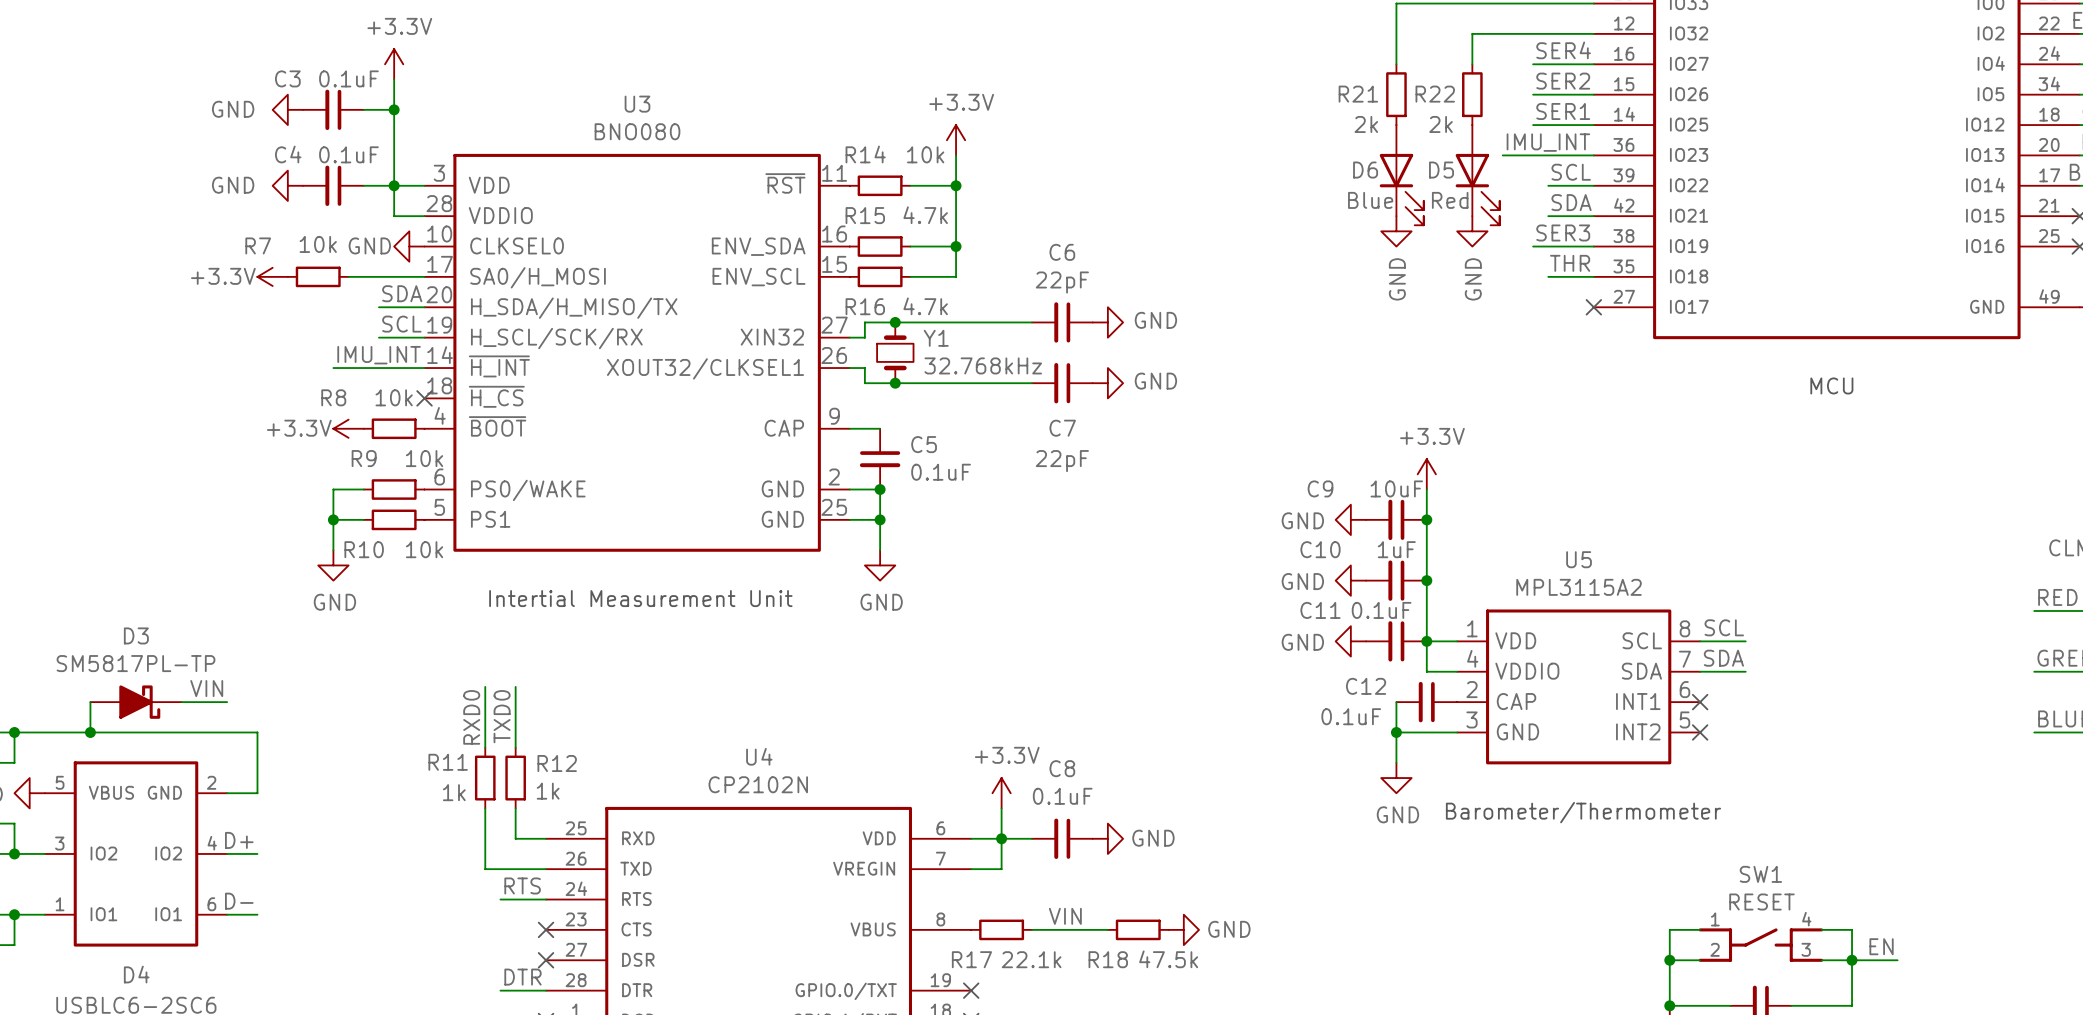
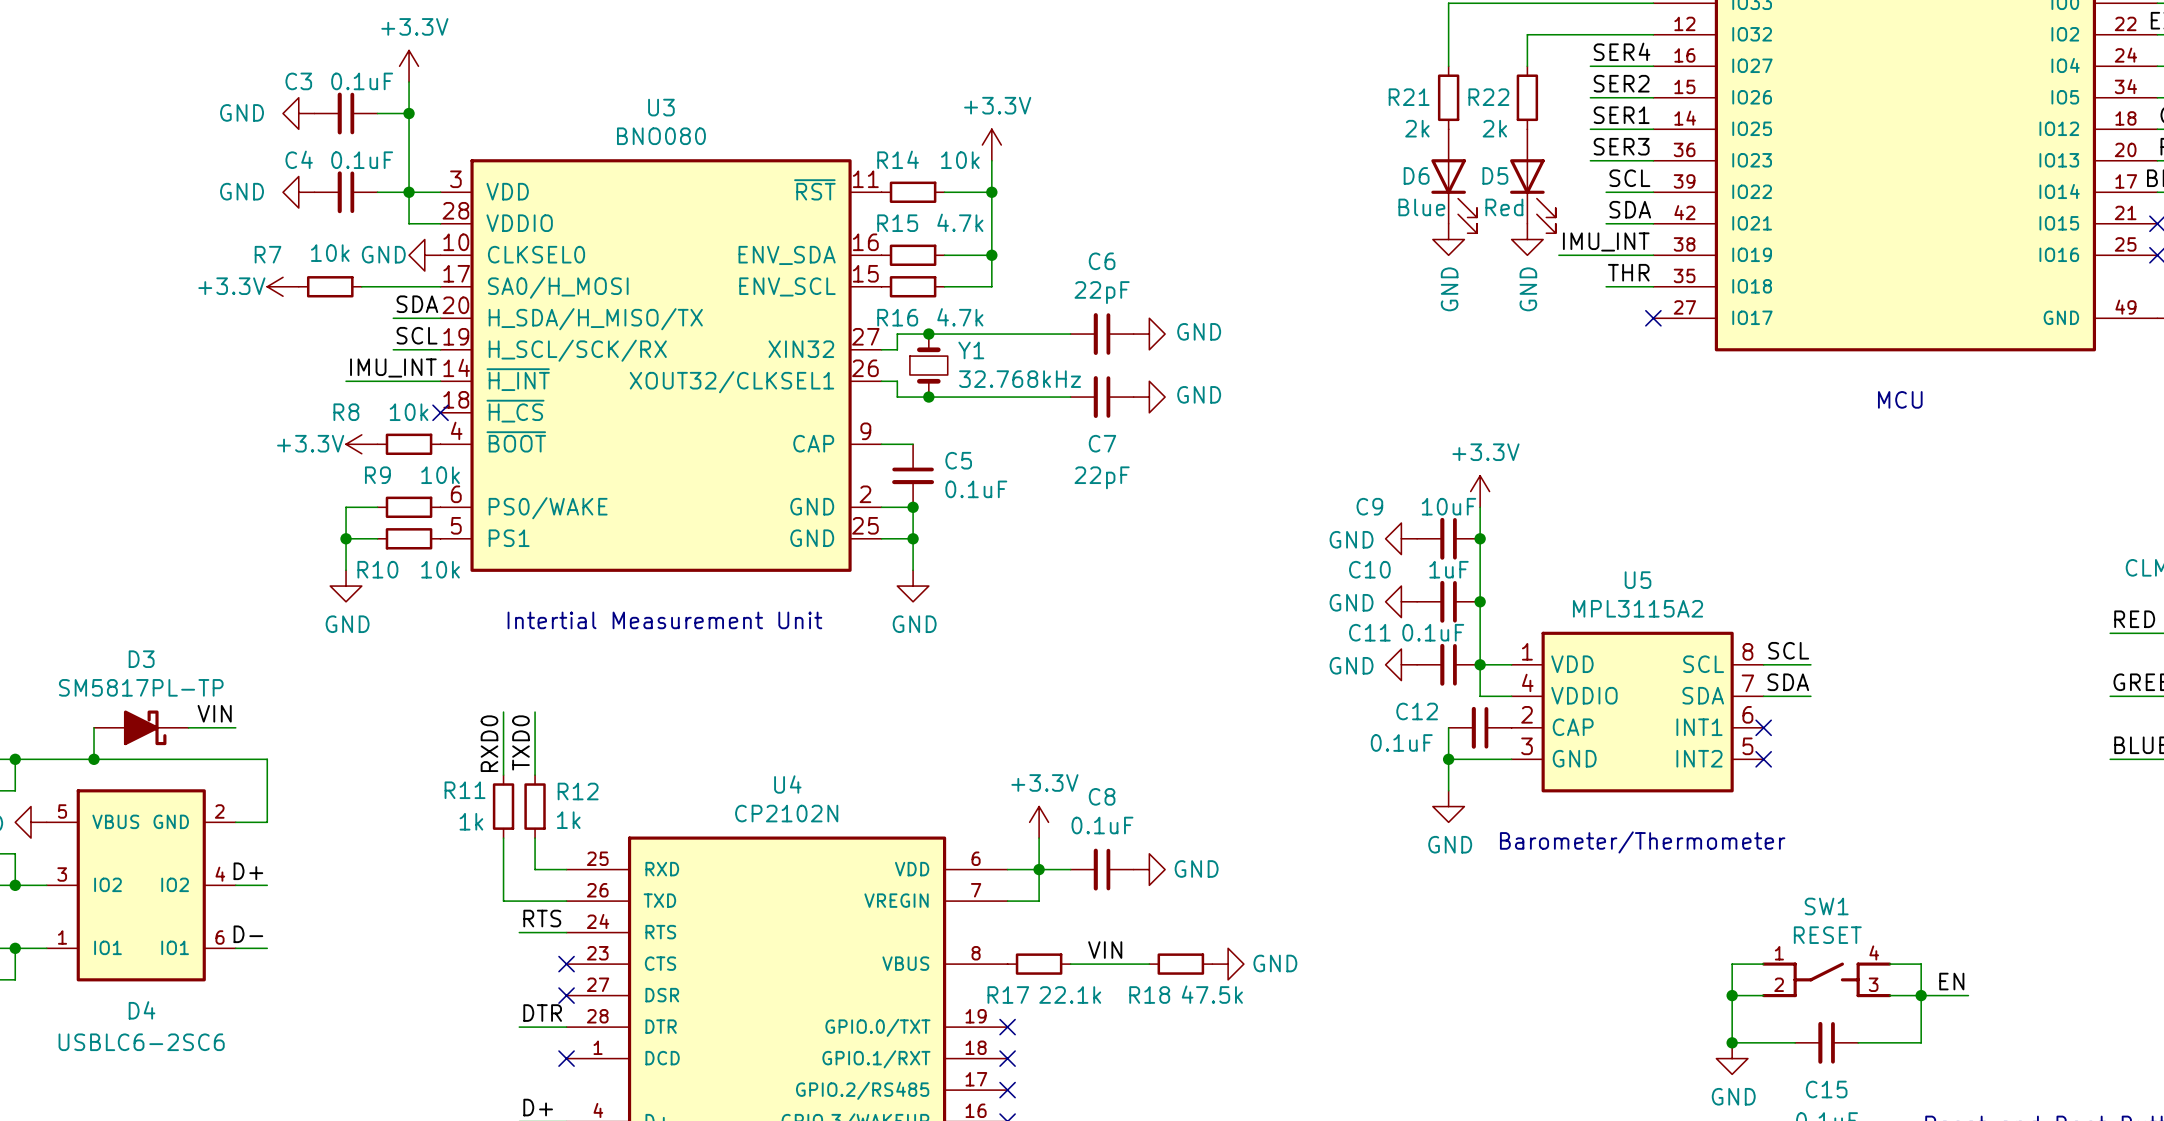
label position: IMU_INT (1548, 142) -> IMU_INT (1606, 241)
wire: (1502, 155) (1533, 155) -> (1558, 255) (1590, 255)
label position: SER3 (1563, 232) -> SER3 (1621, 146)

